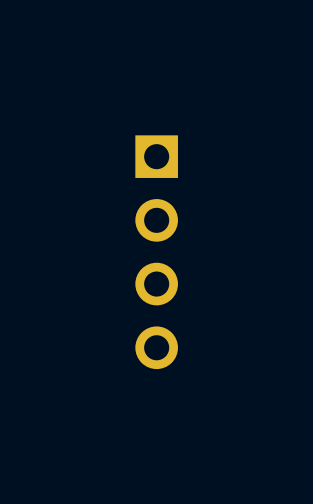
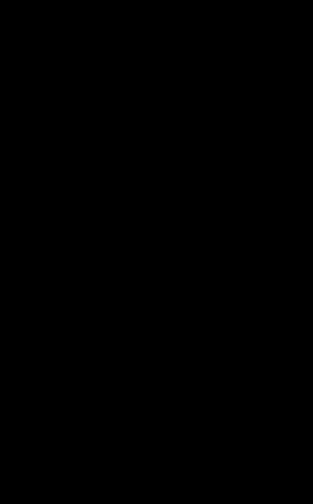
part: (156, 252) -> none

